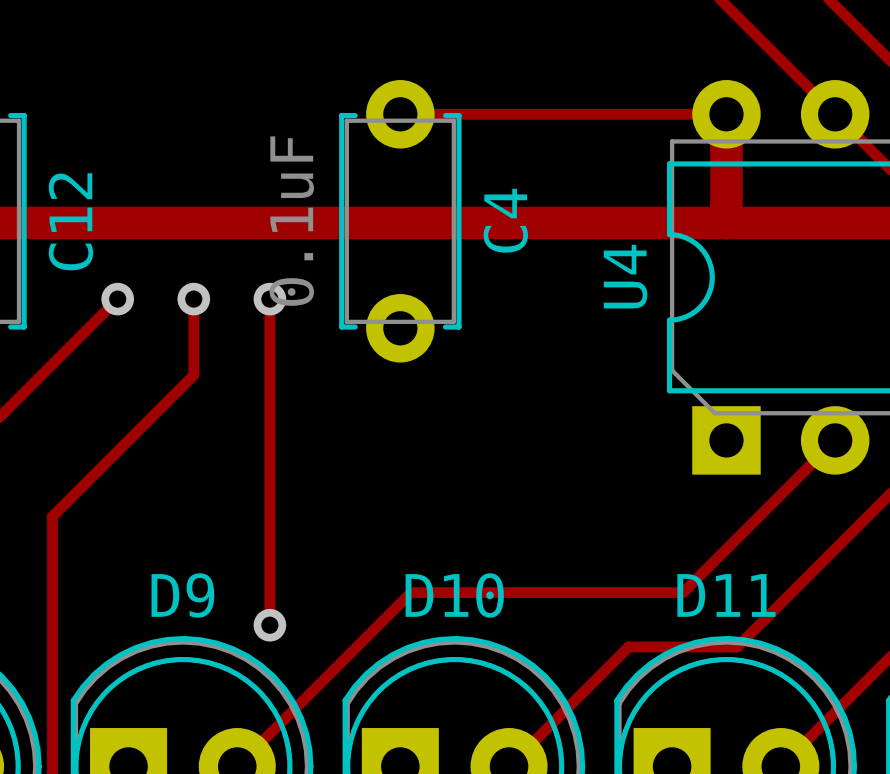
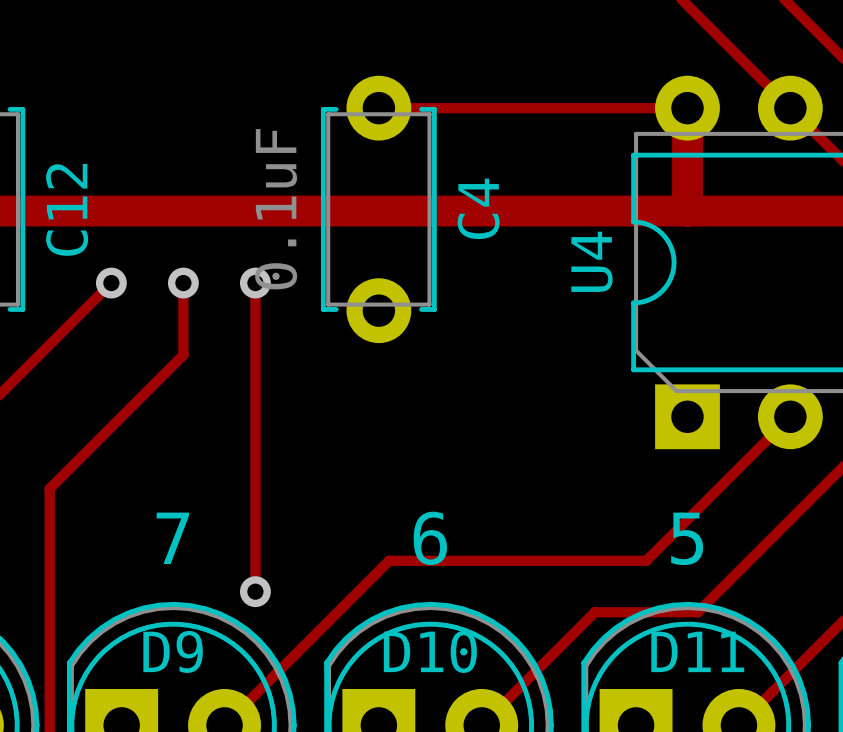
text: none -> 7 (172, 538)
text: none -> 6 (430, 538)
text: none -> 5 (687, 538)
D9 name position: D9 (182, 595) -> D9 (173, 651)
D10 name position: D10 (454, 595) -> D10 (430, 651)
D11 name position: D11 (726, 595) -> D11 (697, 651)

